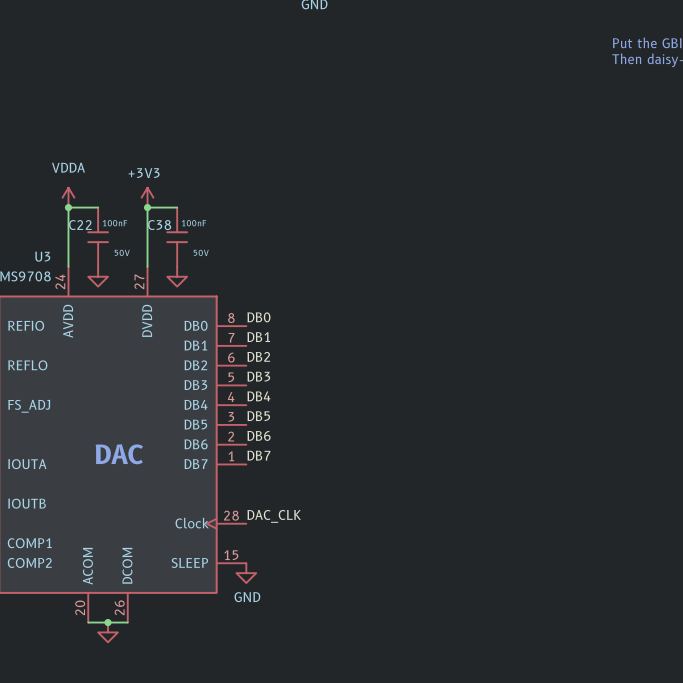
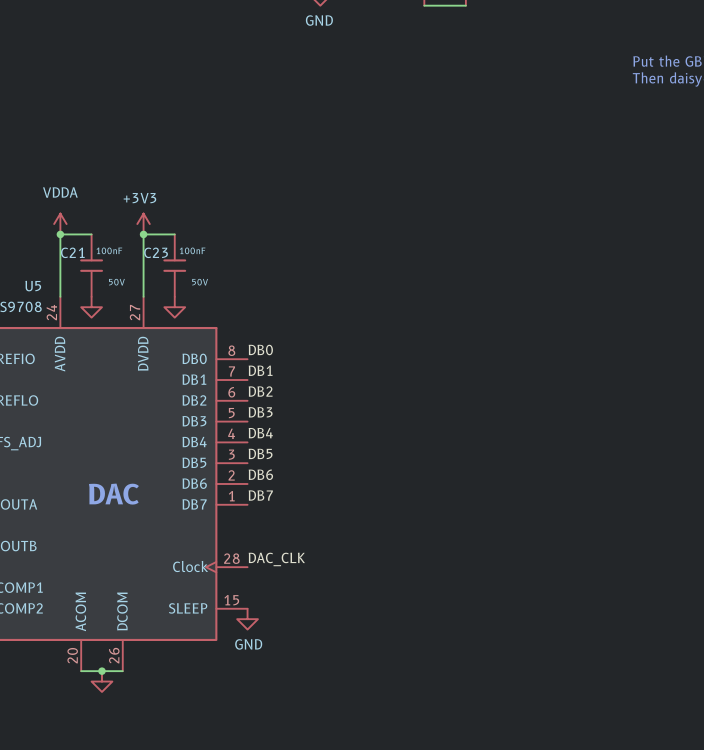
C22 name: C22 (80, 225) -> C21 (72, 252)
C38 name: C38 (159, 225) -> C23 (156, 252)
U3 name: U3 (42, 256) -> U5 (33, 286)

